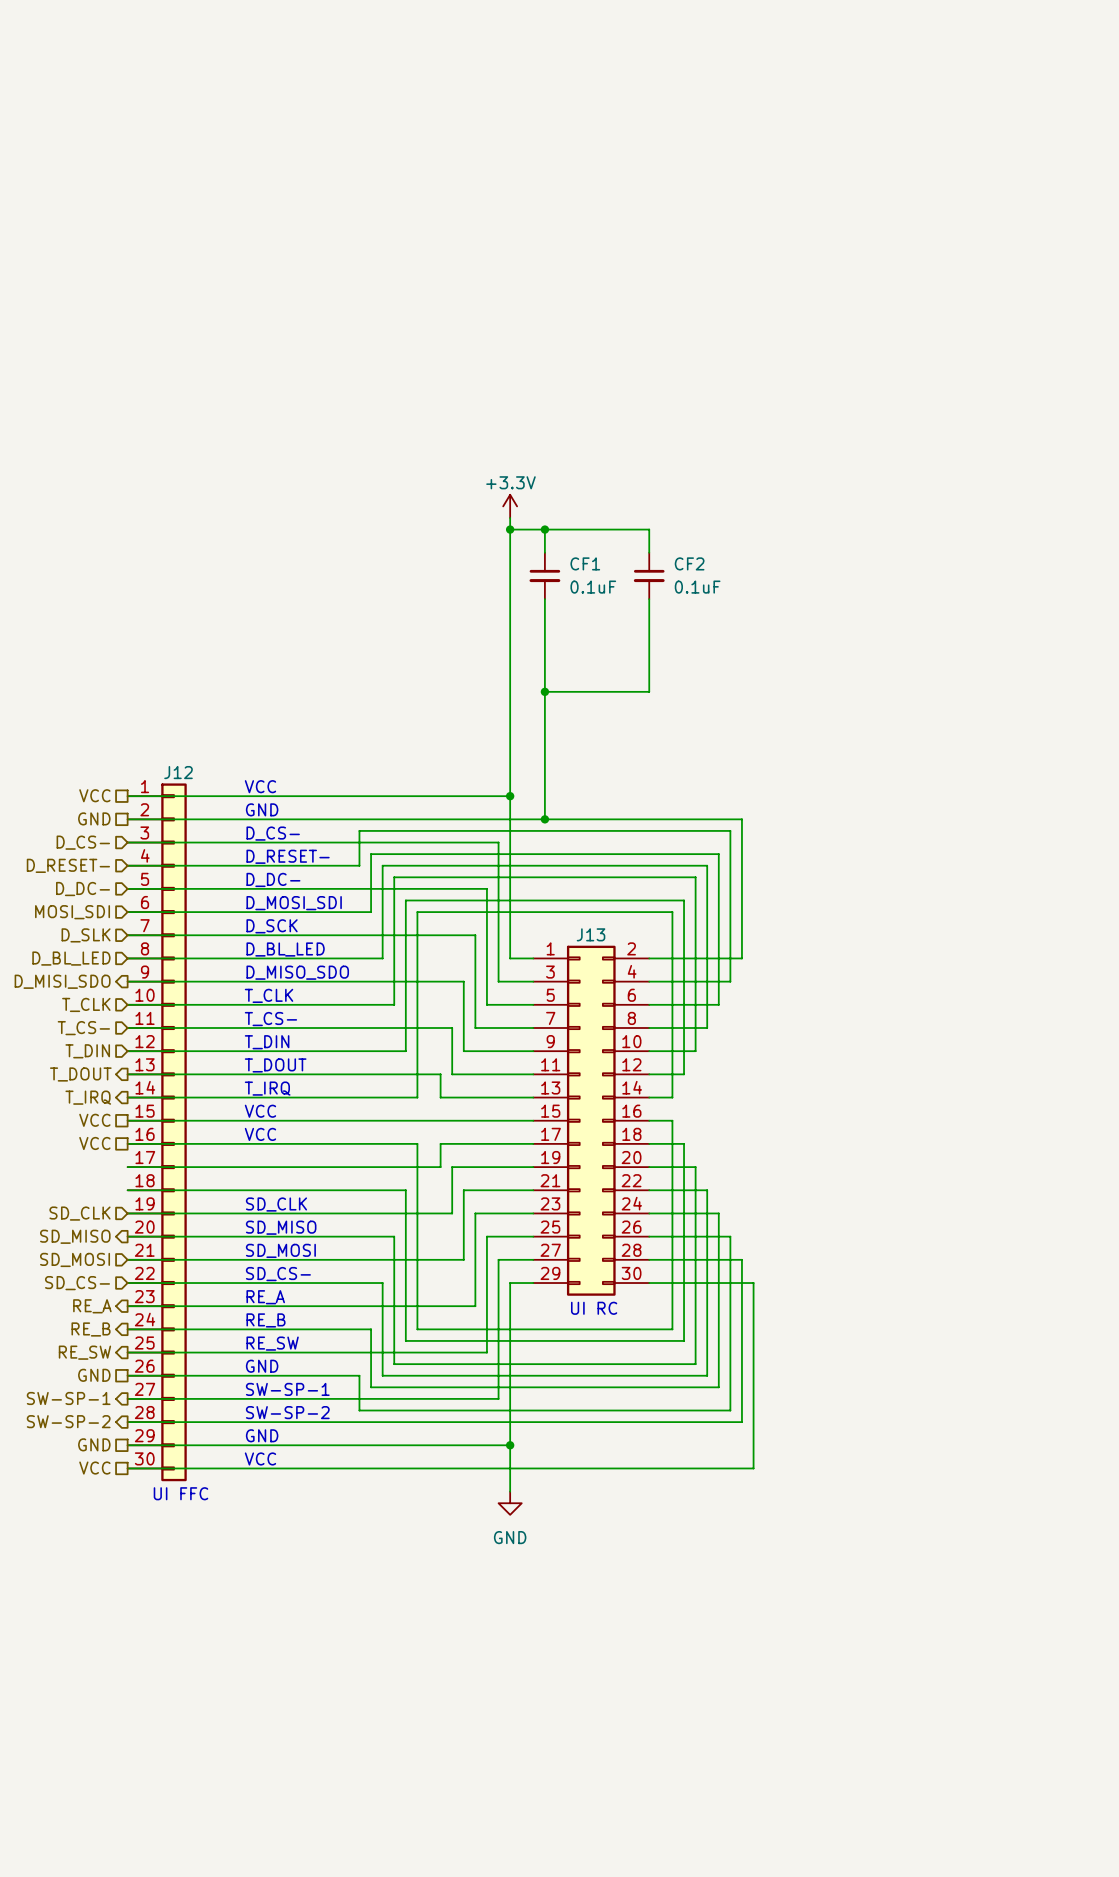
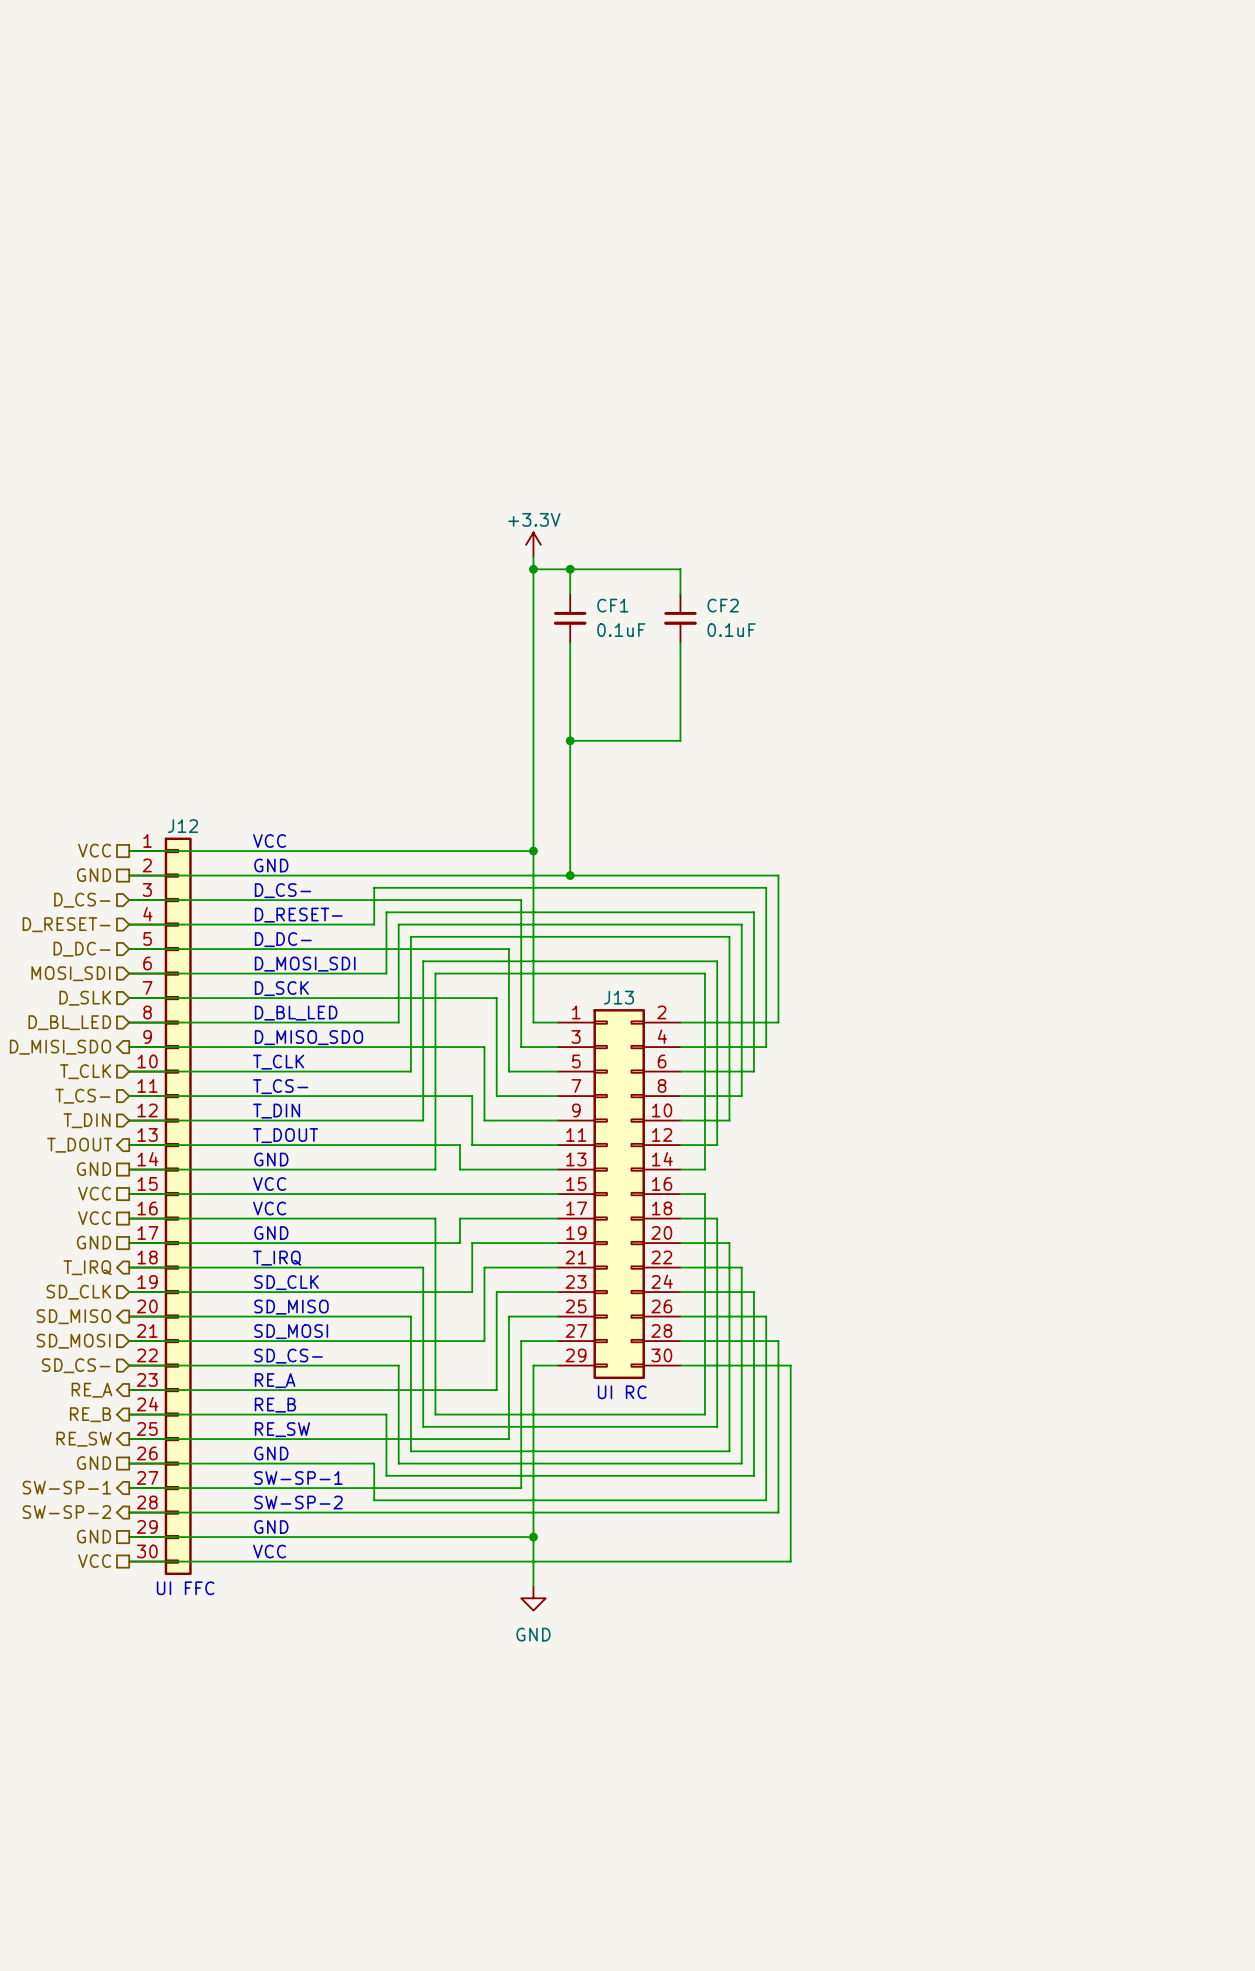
text: T_IRQ (267, 1088) -> GND (271, 1159)
hierarchical label shape: output (88, 1097) -> passive (94, 1169)
hierarchical label: T_IRQ (88, 1097) -> GND (94, 1169)
text: none -> GND (271, 1233)
hierarchical label: none -> GND (94, 1242)
text: none -> T_IRQ (277, 1258)
hierarchical label: none -> T_IRQ (87, 1267)

